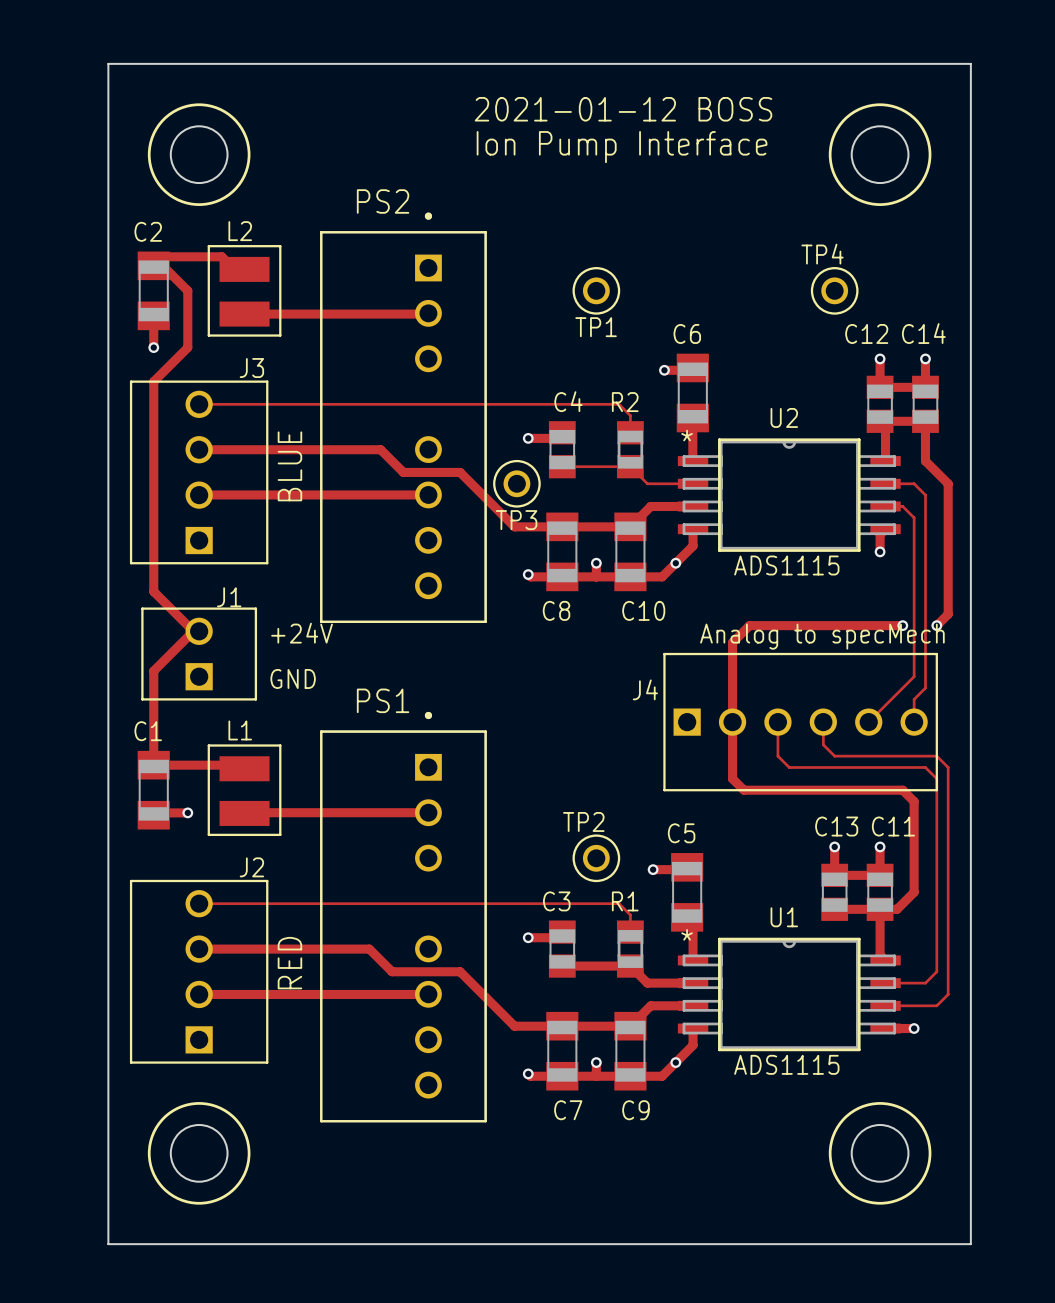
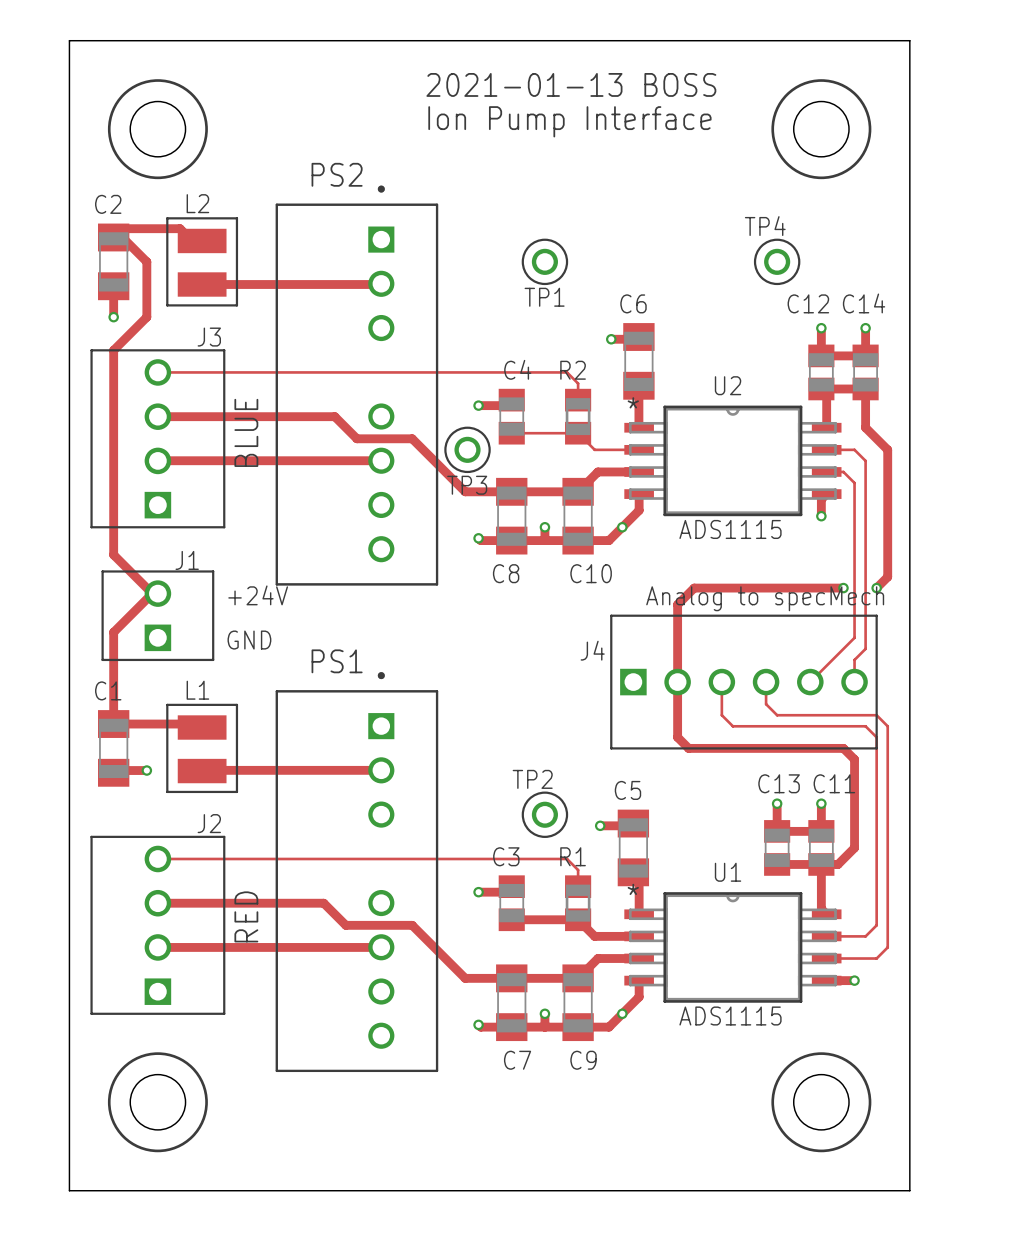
text: 2021-01-12 BOSS (623, 109) -> 2021-01-13 BOSS (571, 84)

